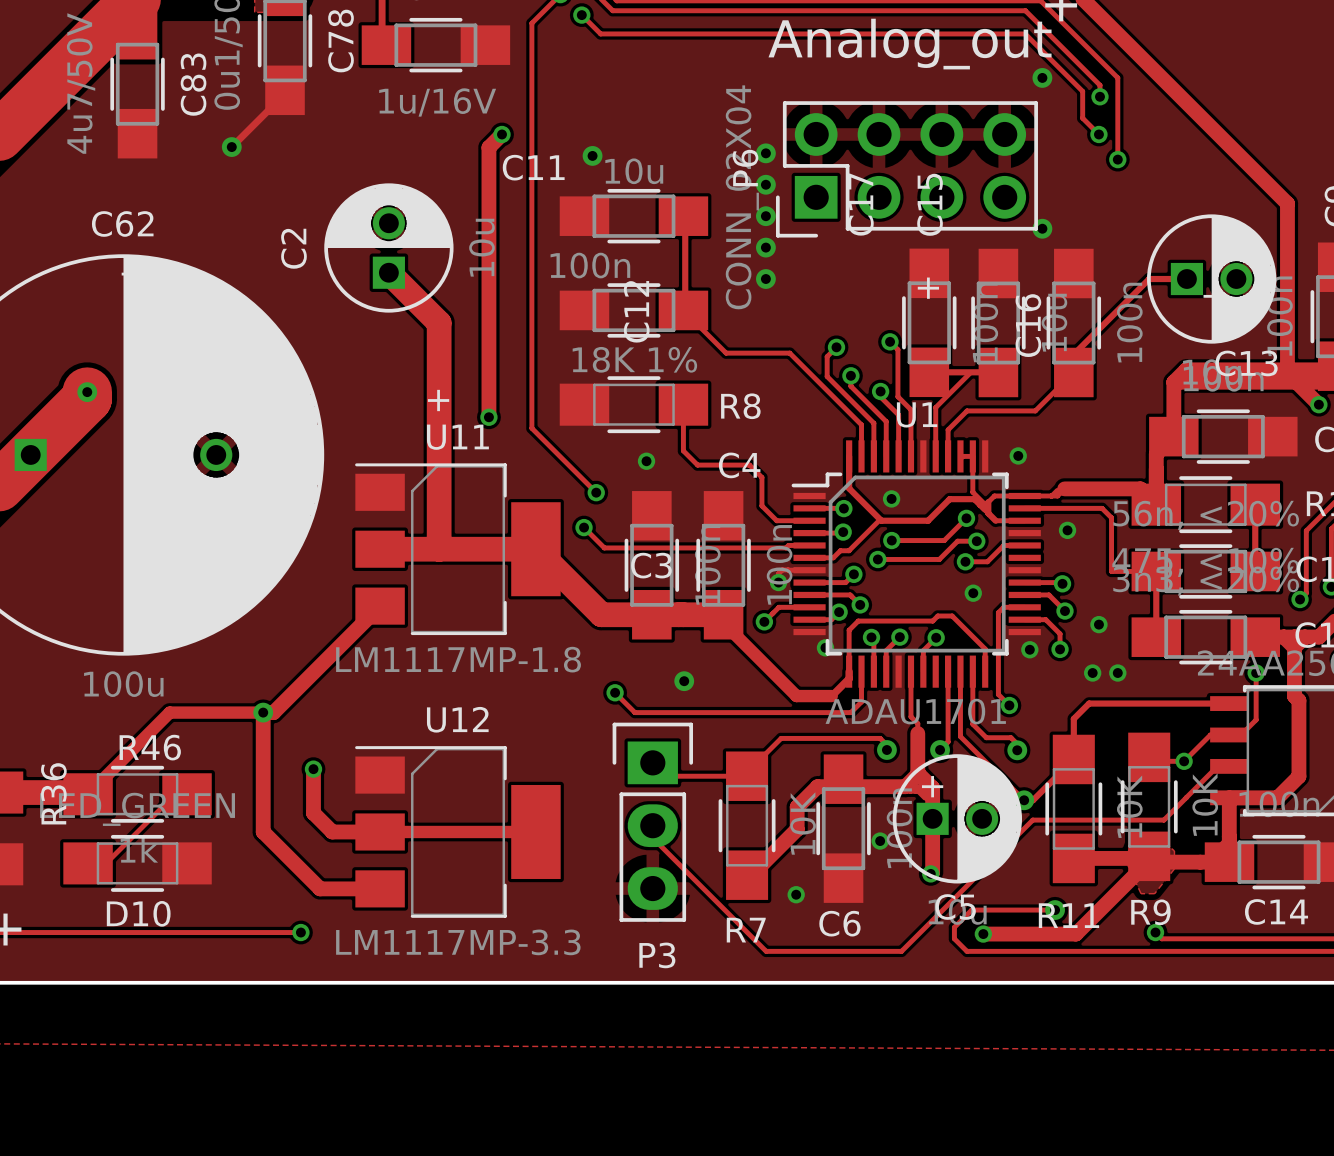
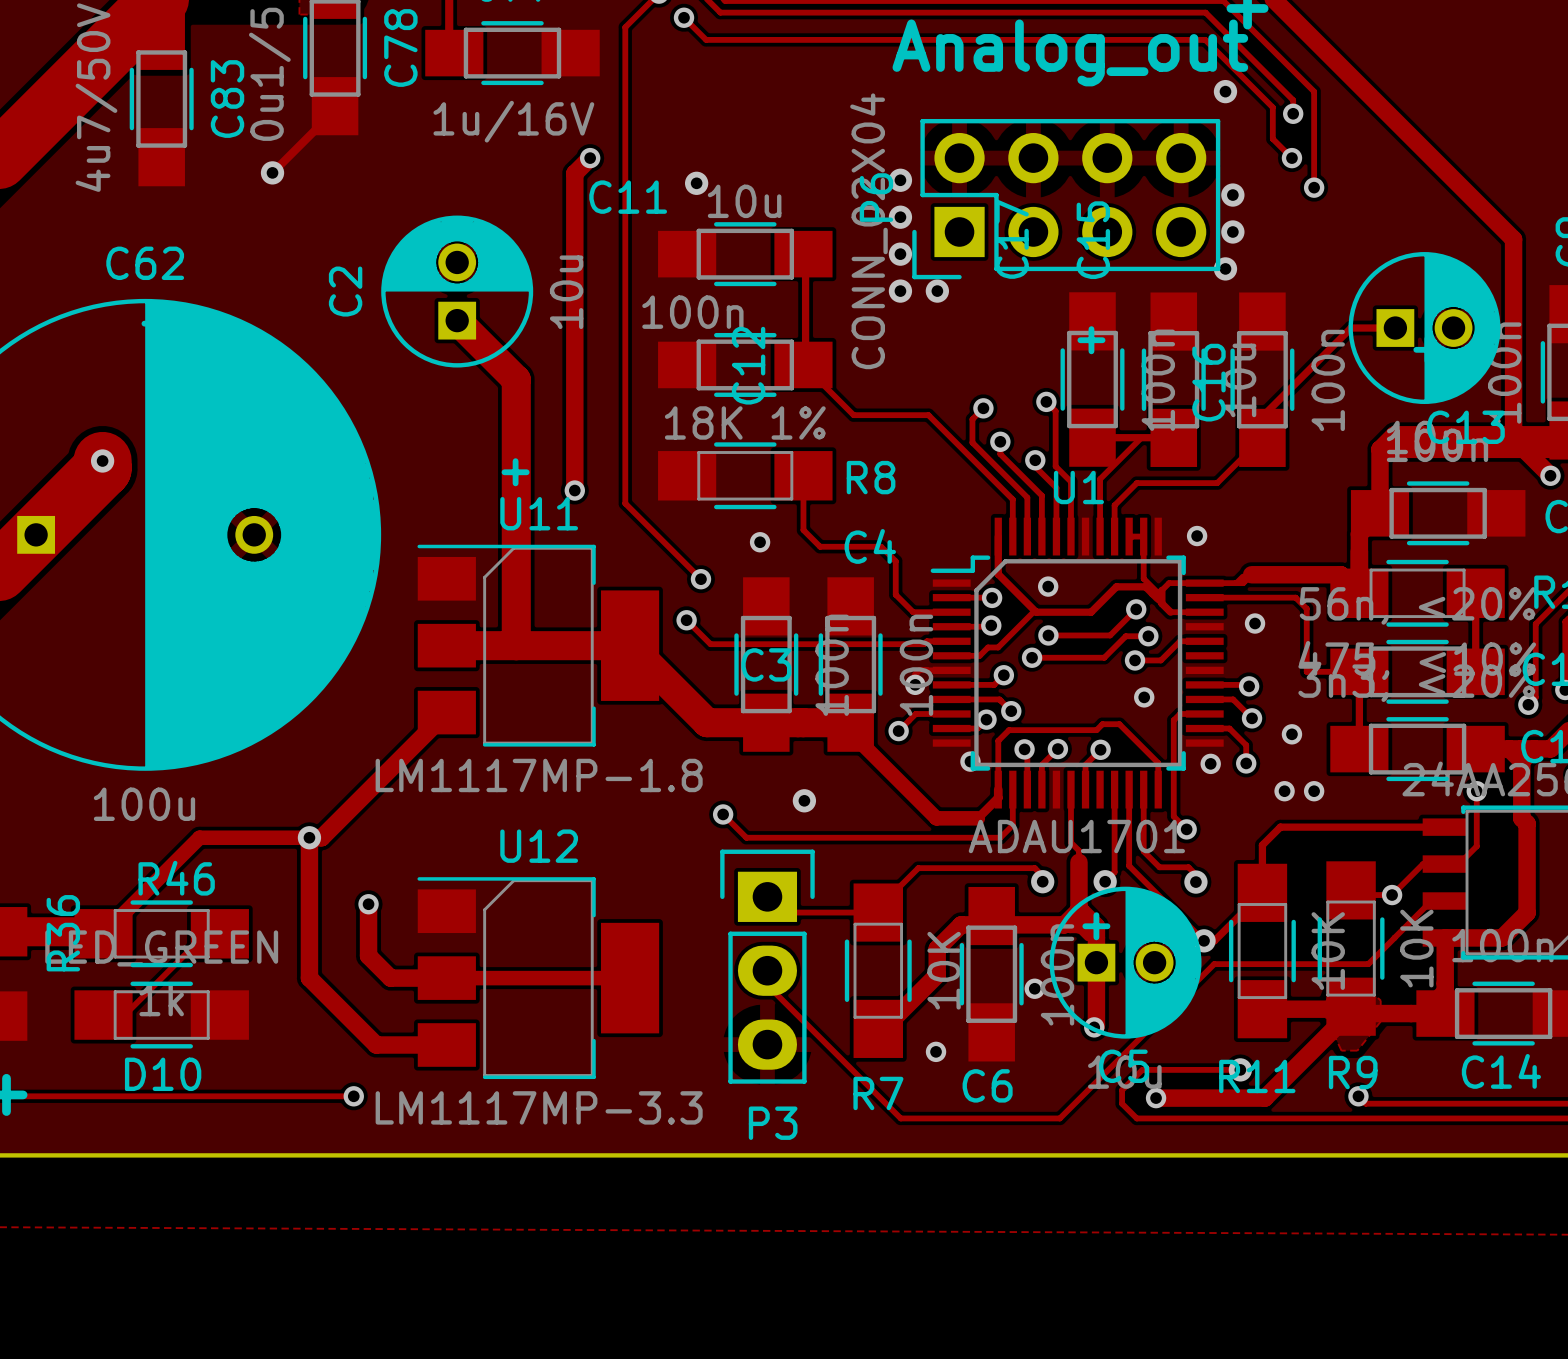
via: none -> (1232, 195)
via: none -> (1232, 231)
via position: (765, 279) -> (937, 291)

